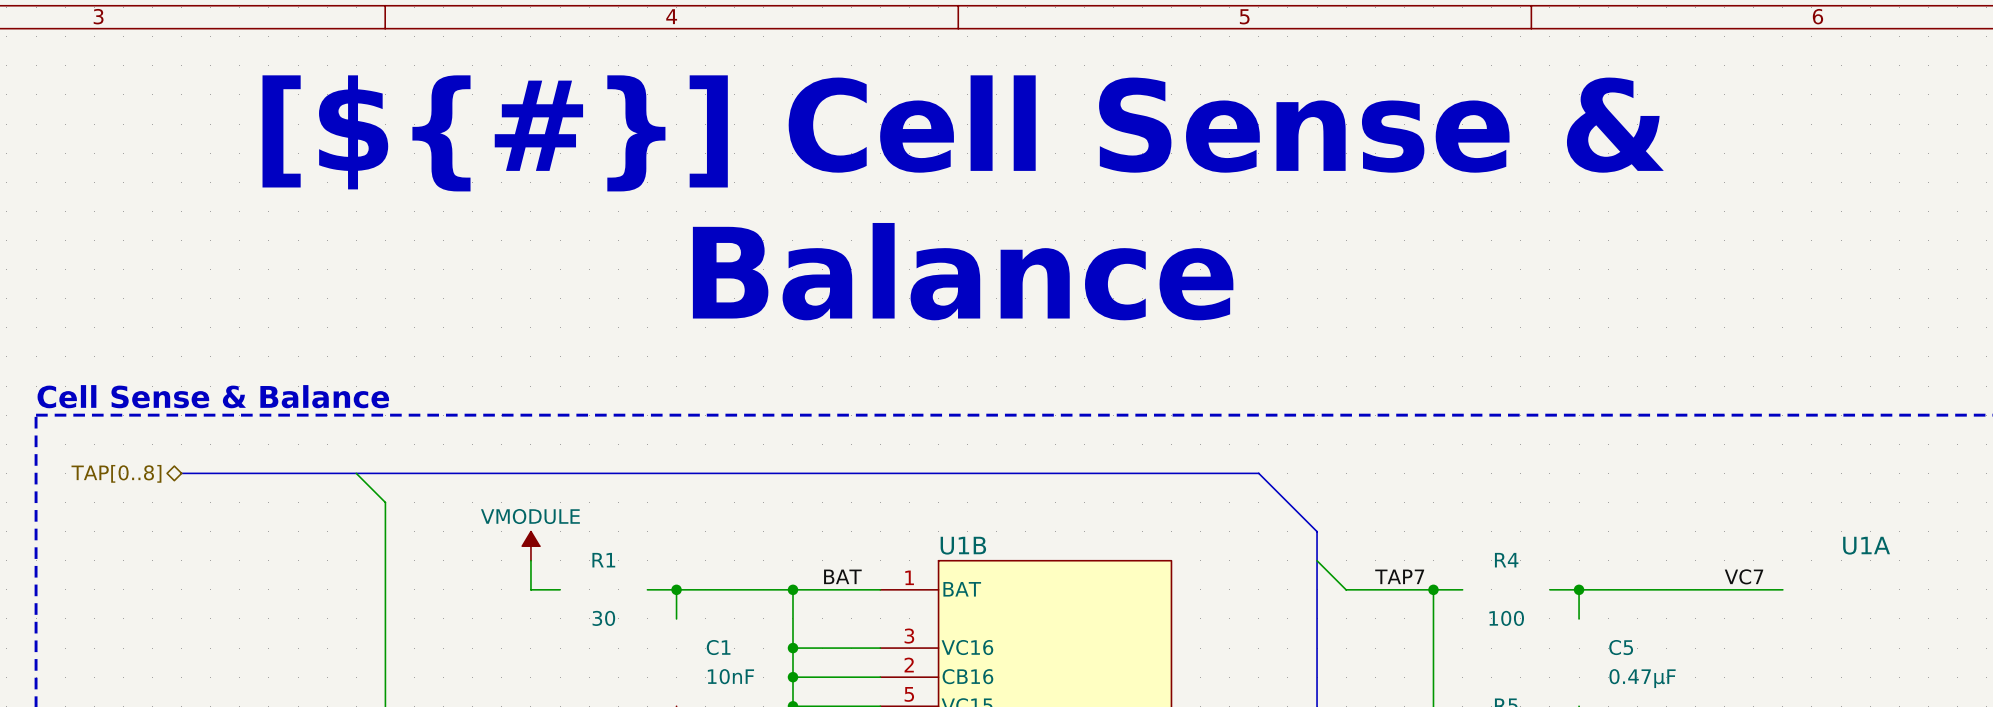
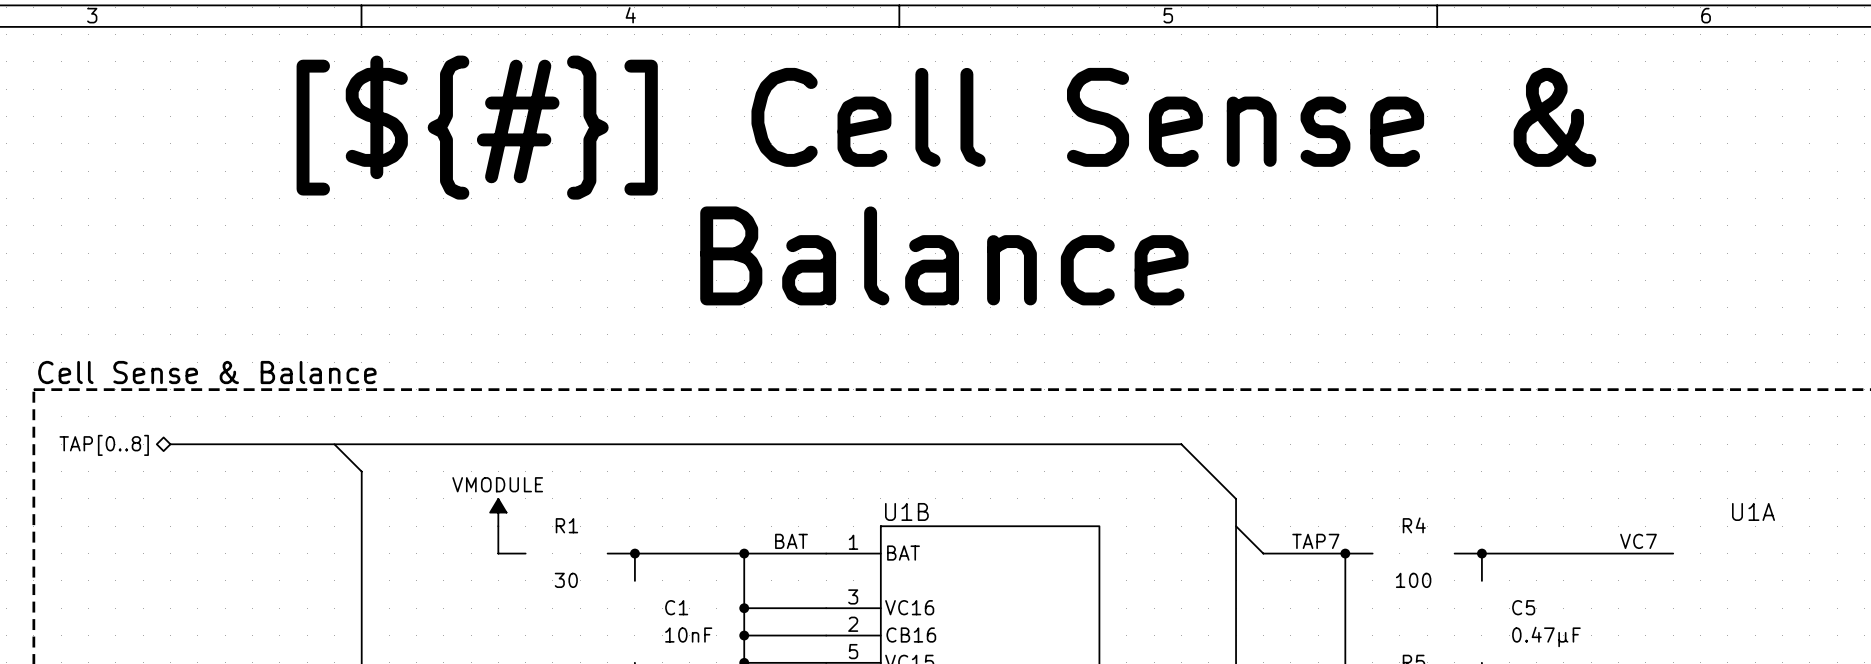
text position: [${#}] Cell Sense & (963, 133) -> [${#}] Cell Sense & (946, 127)
text position: Balance (963, 271) -> Balance (944, 255)

